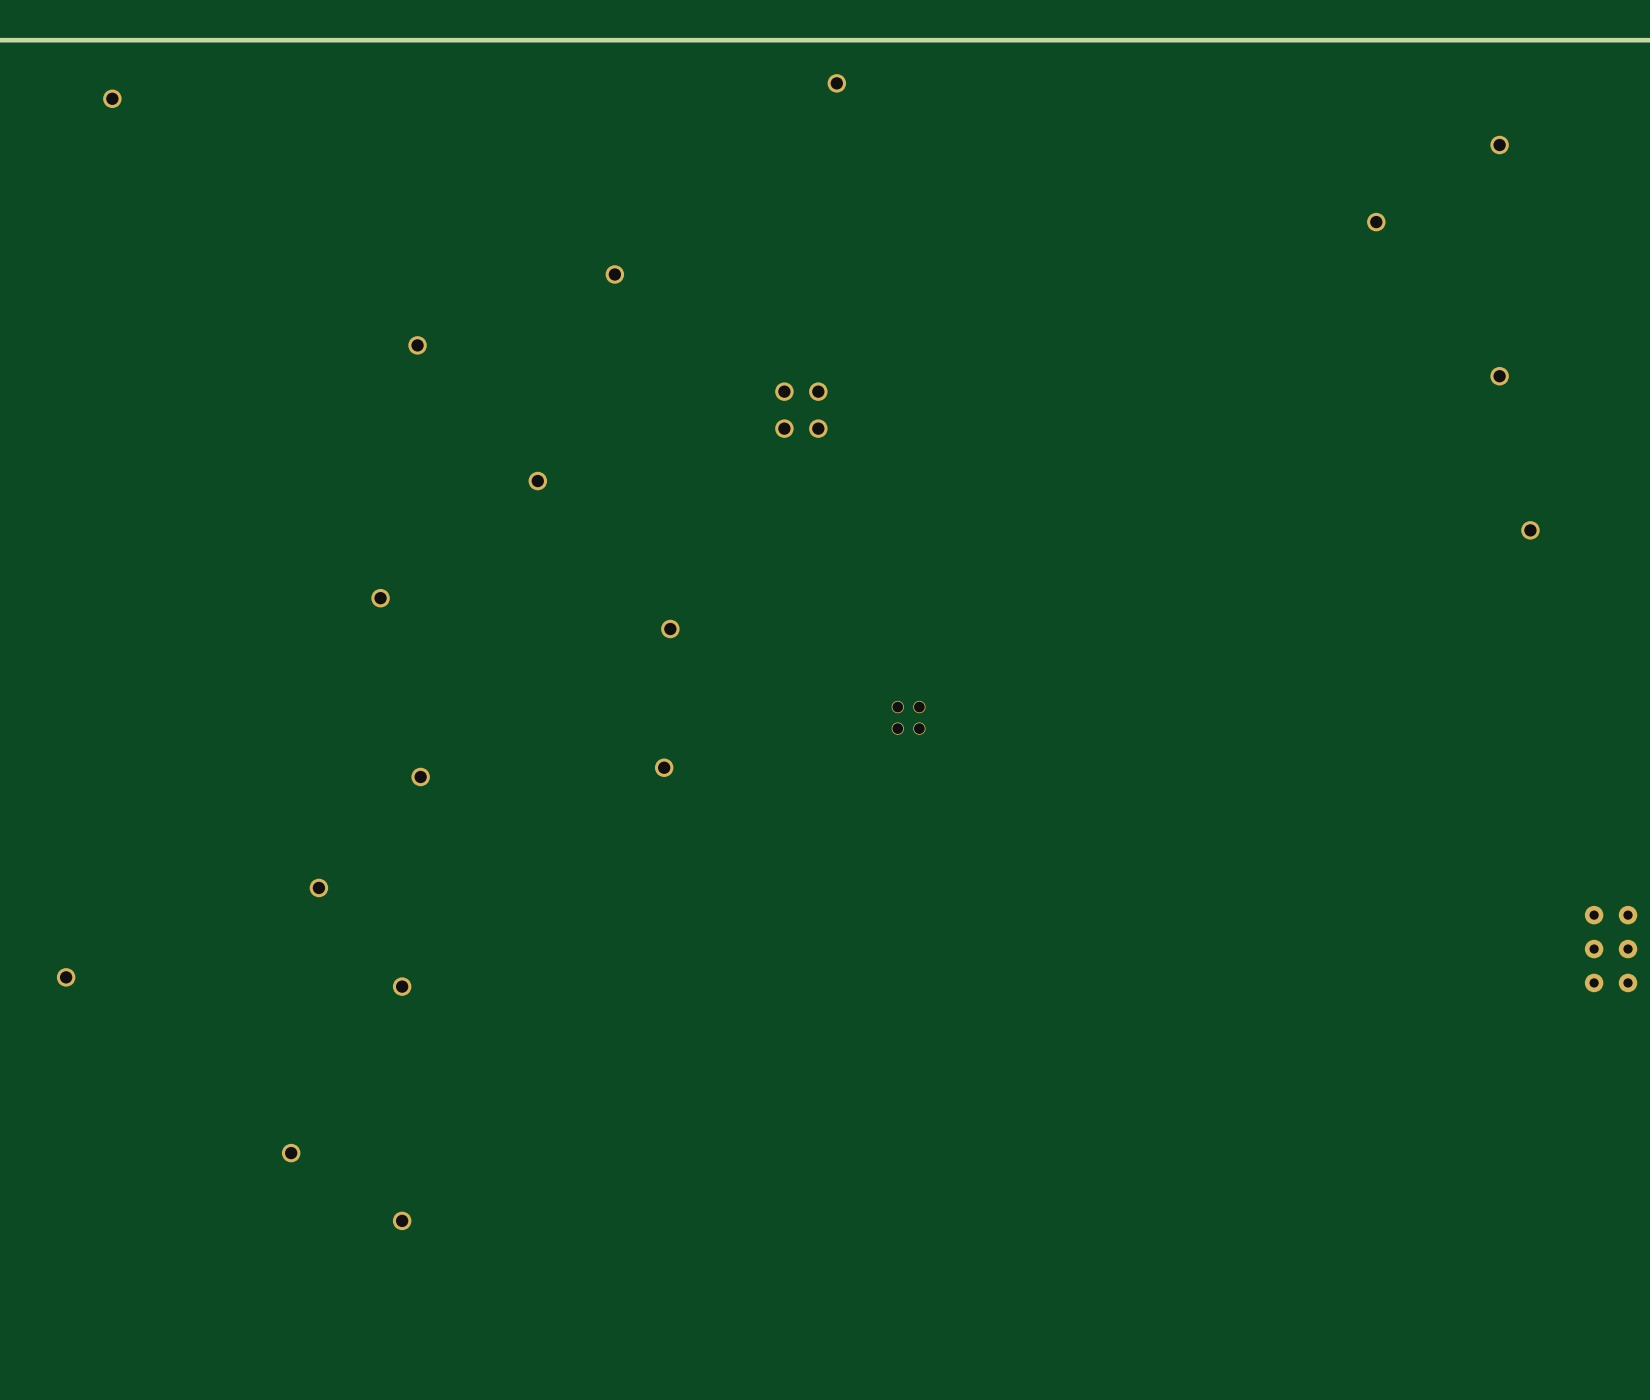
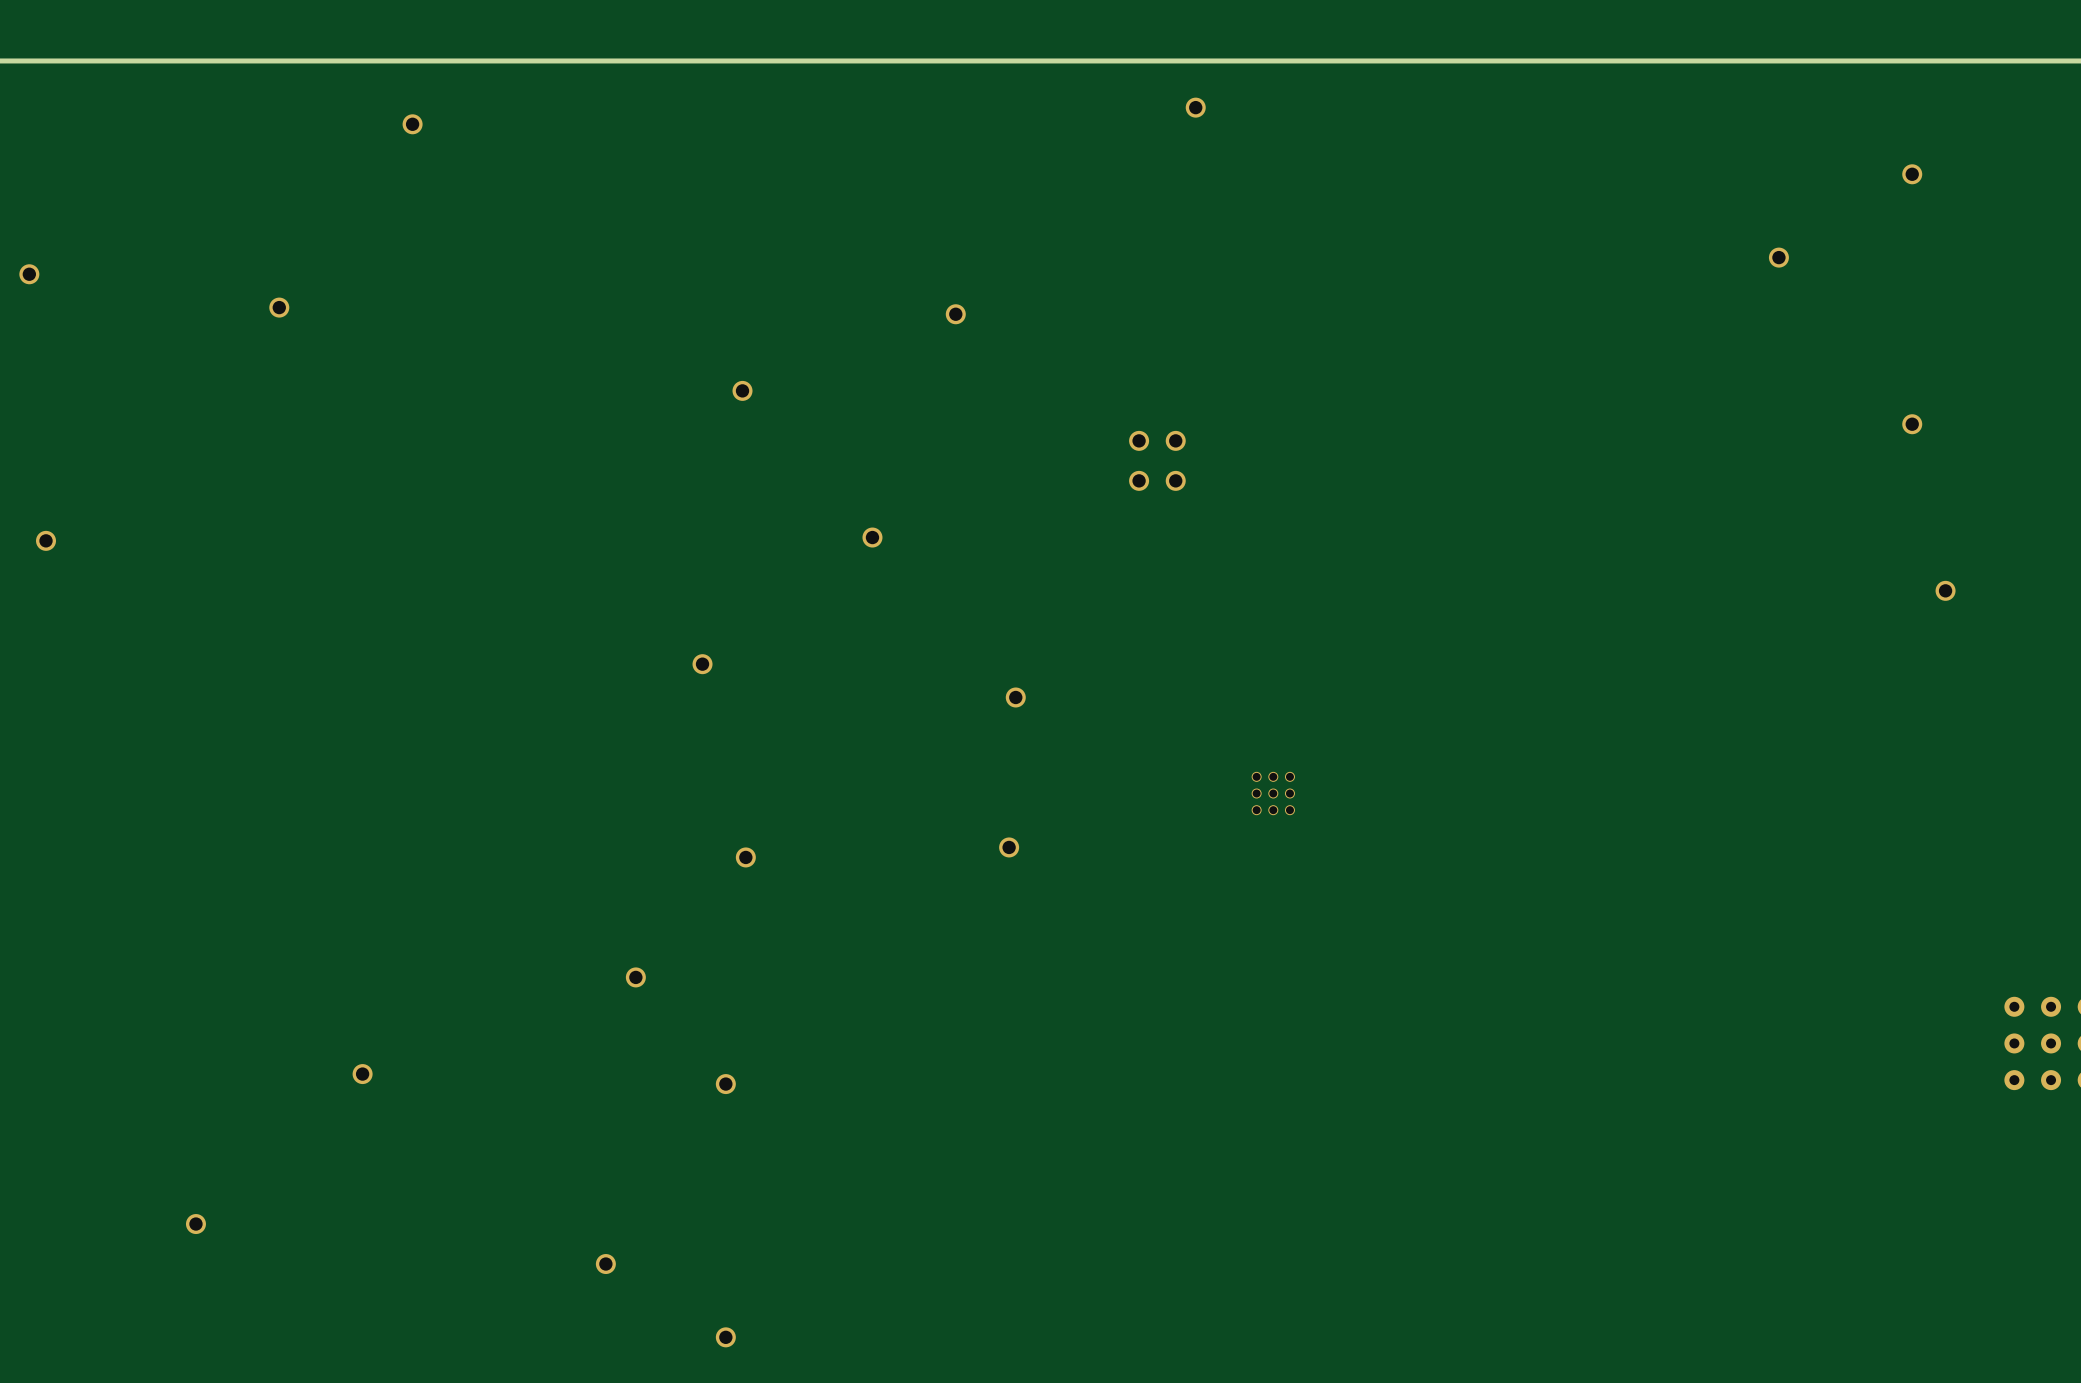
part footprint: [891, 700, 926, 735] -> [1251, 771, 1295, 816]

